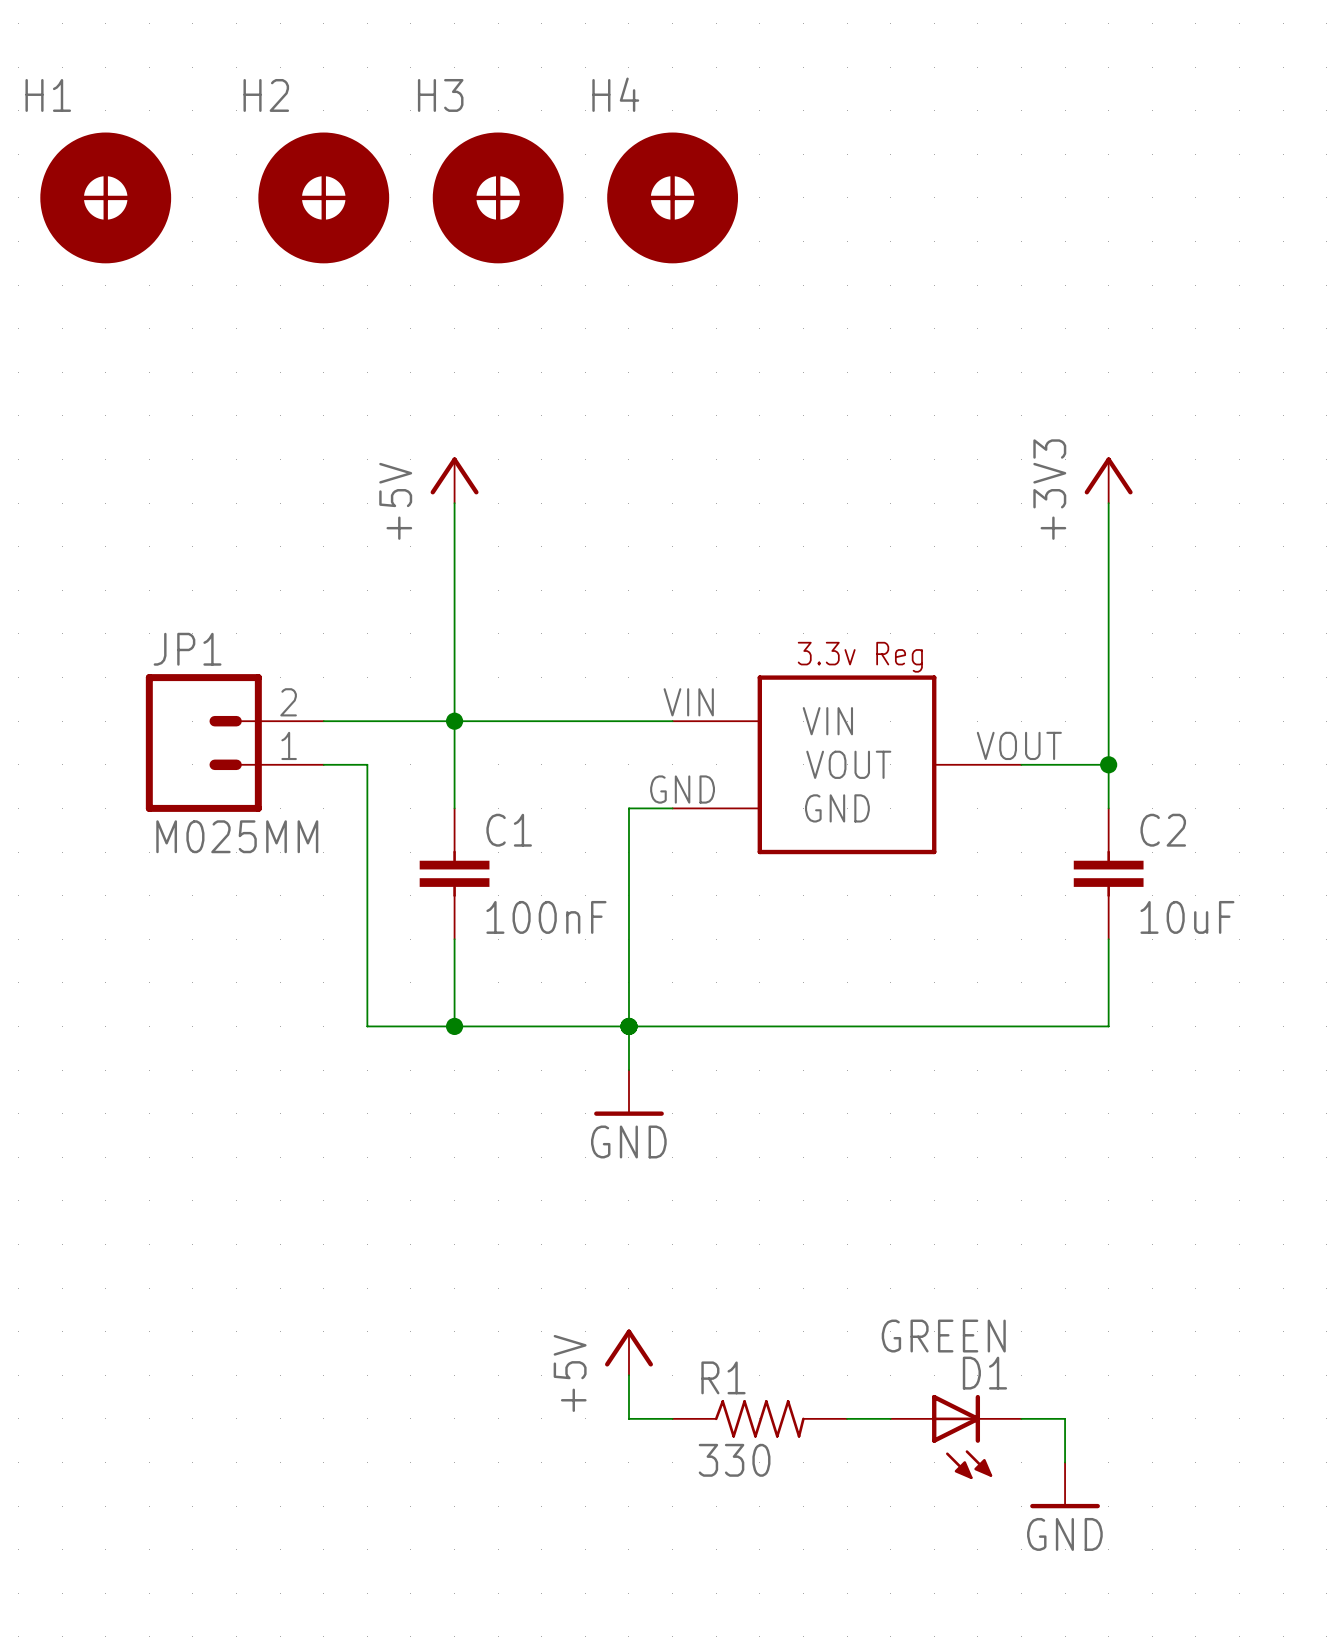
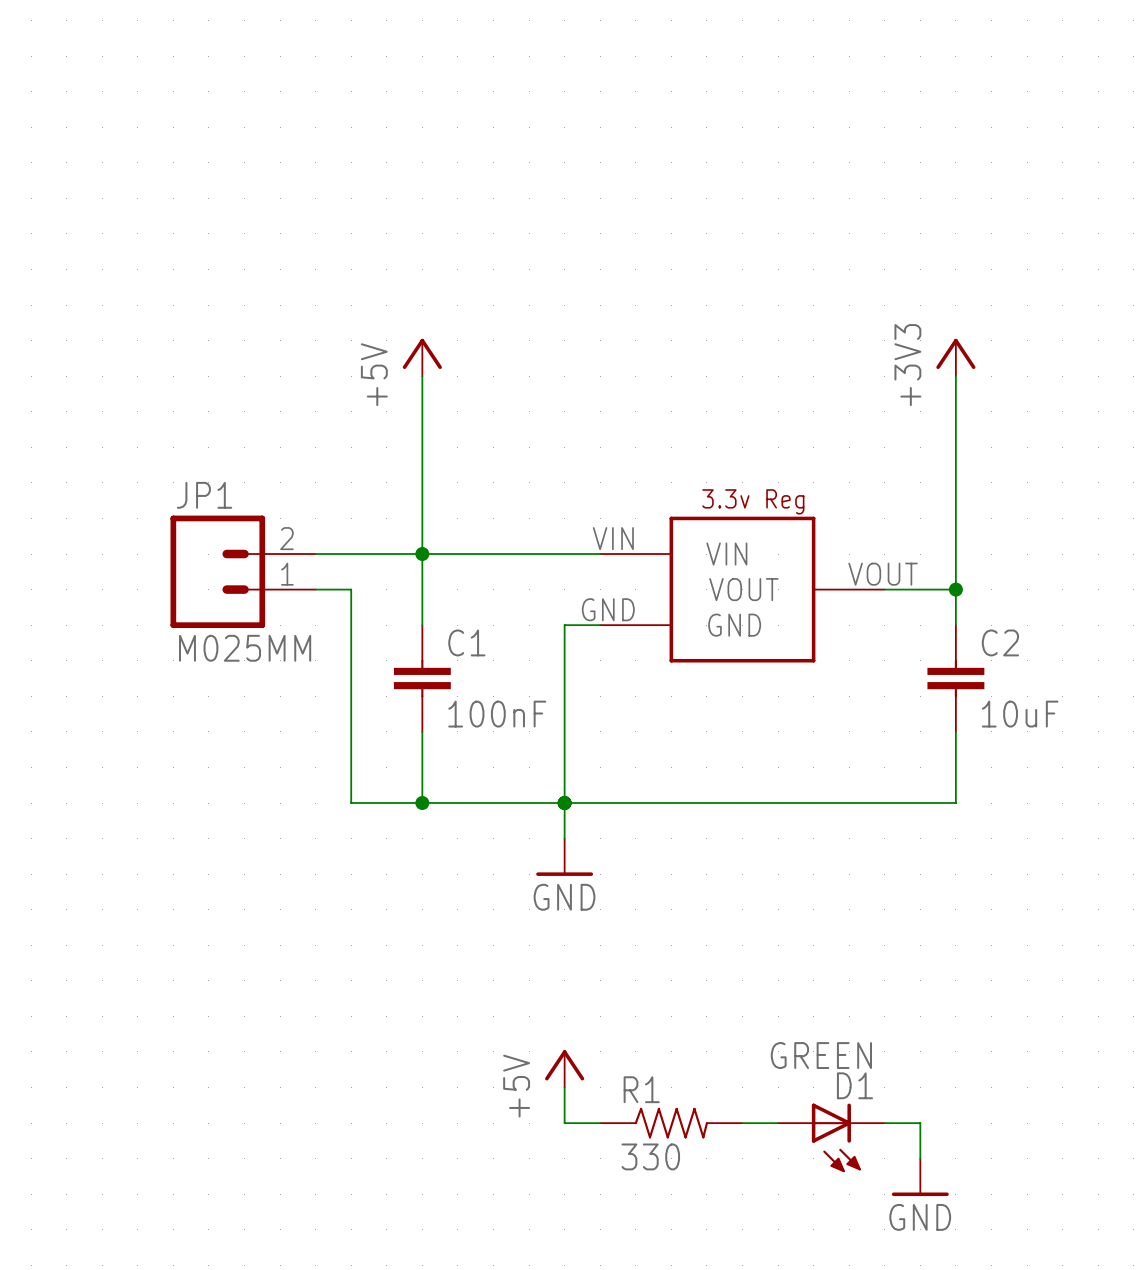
H1: (105, 197) -> none
H2: (323, 197) -> none
H3: (498, 197) -> none
H4: (672, 197) -> none

